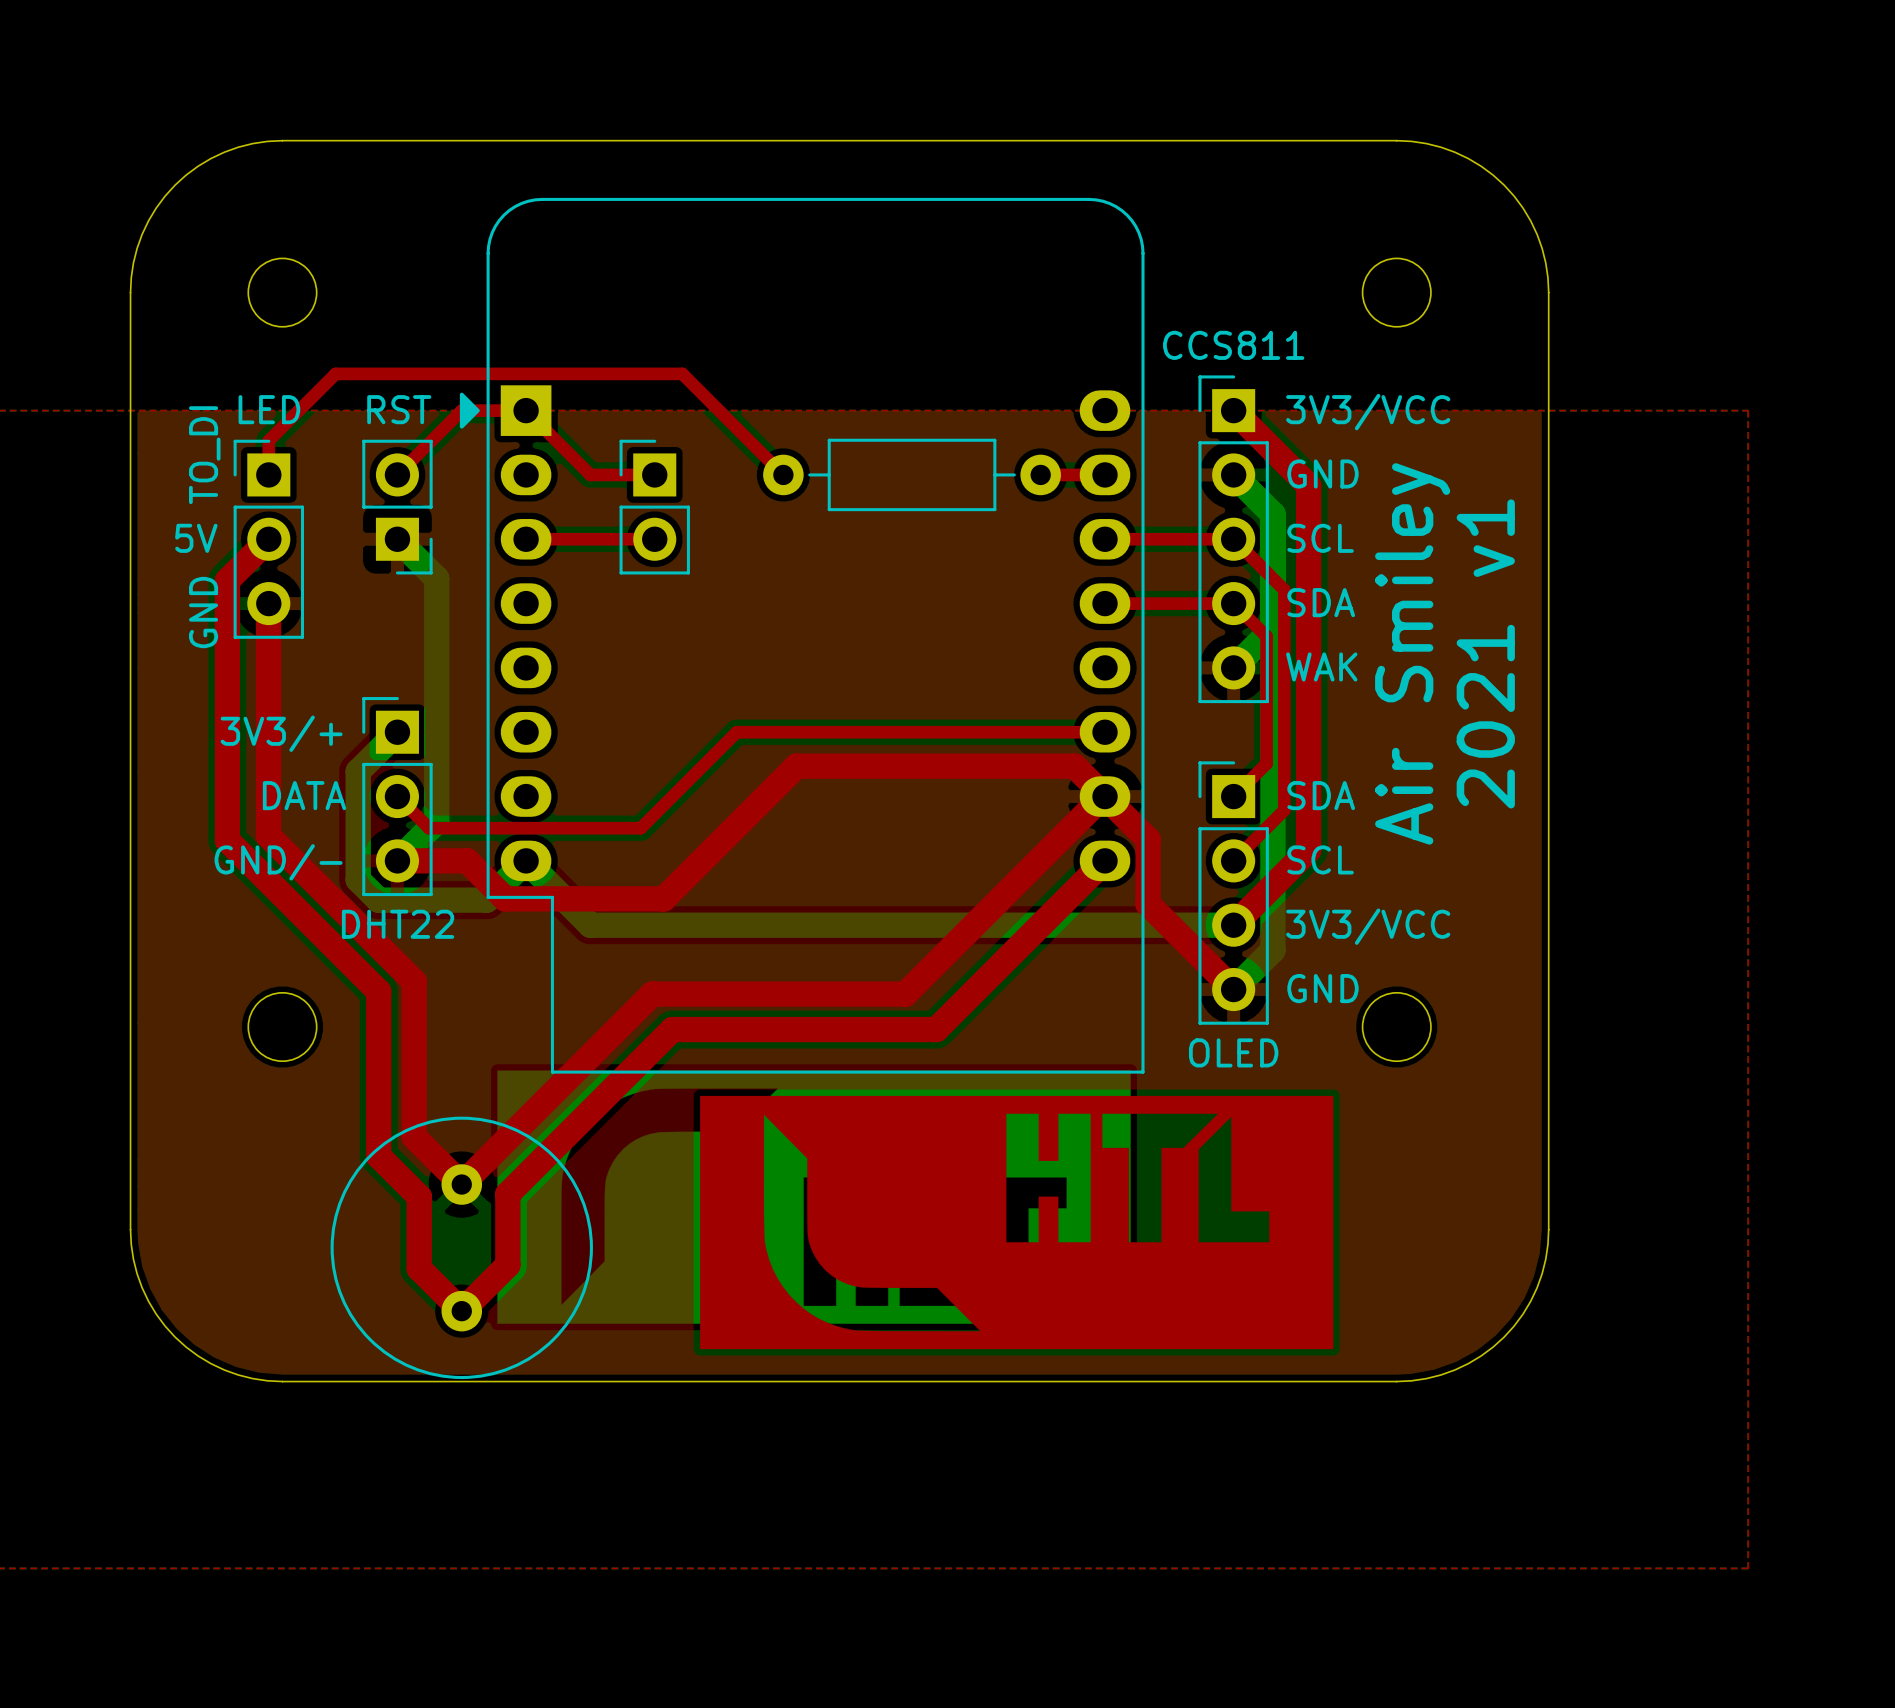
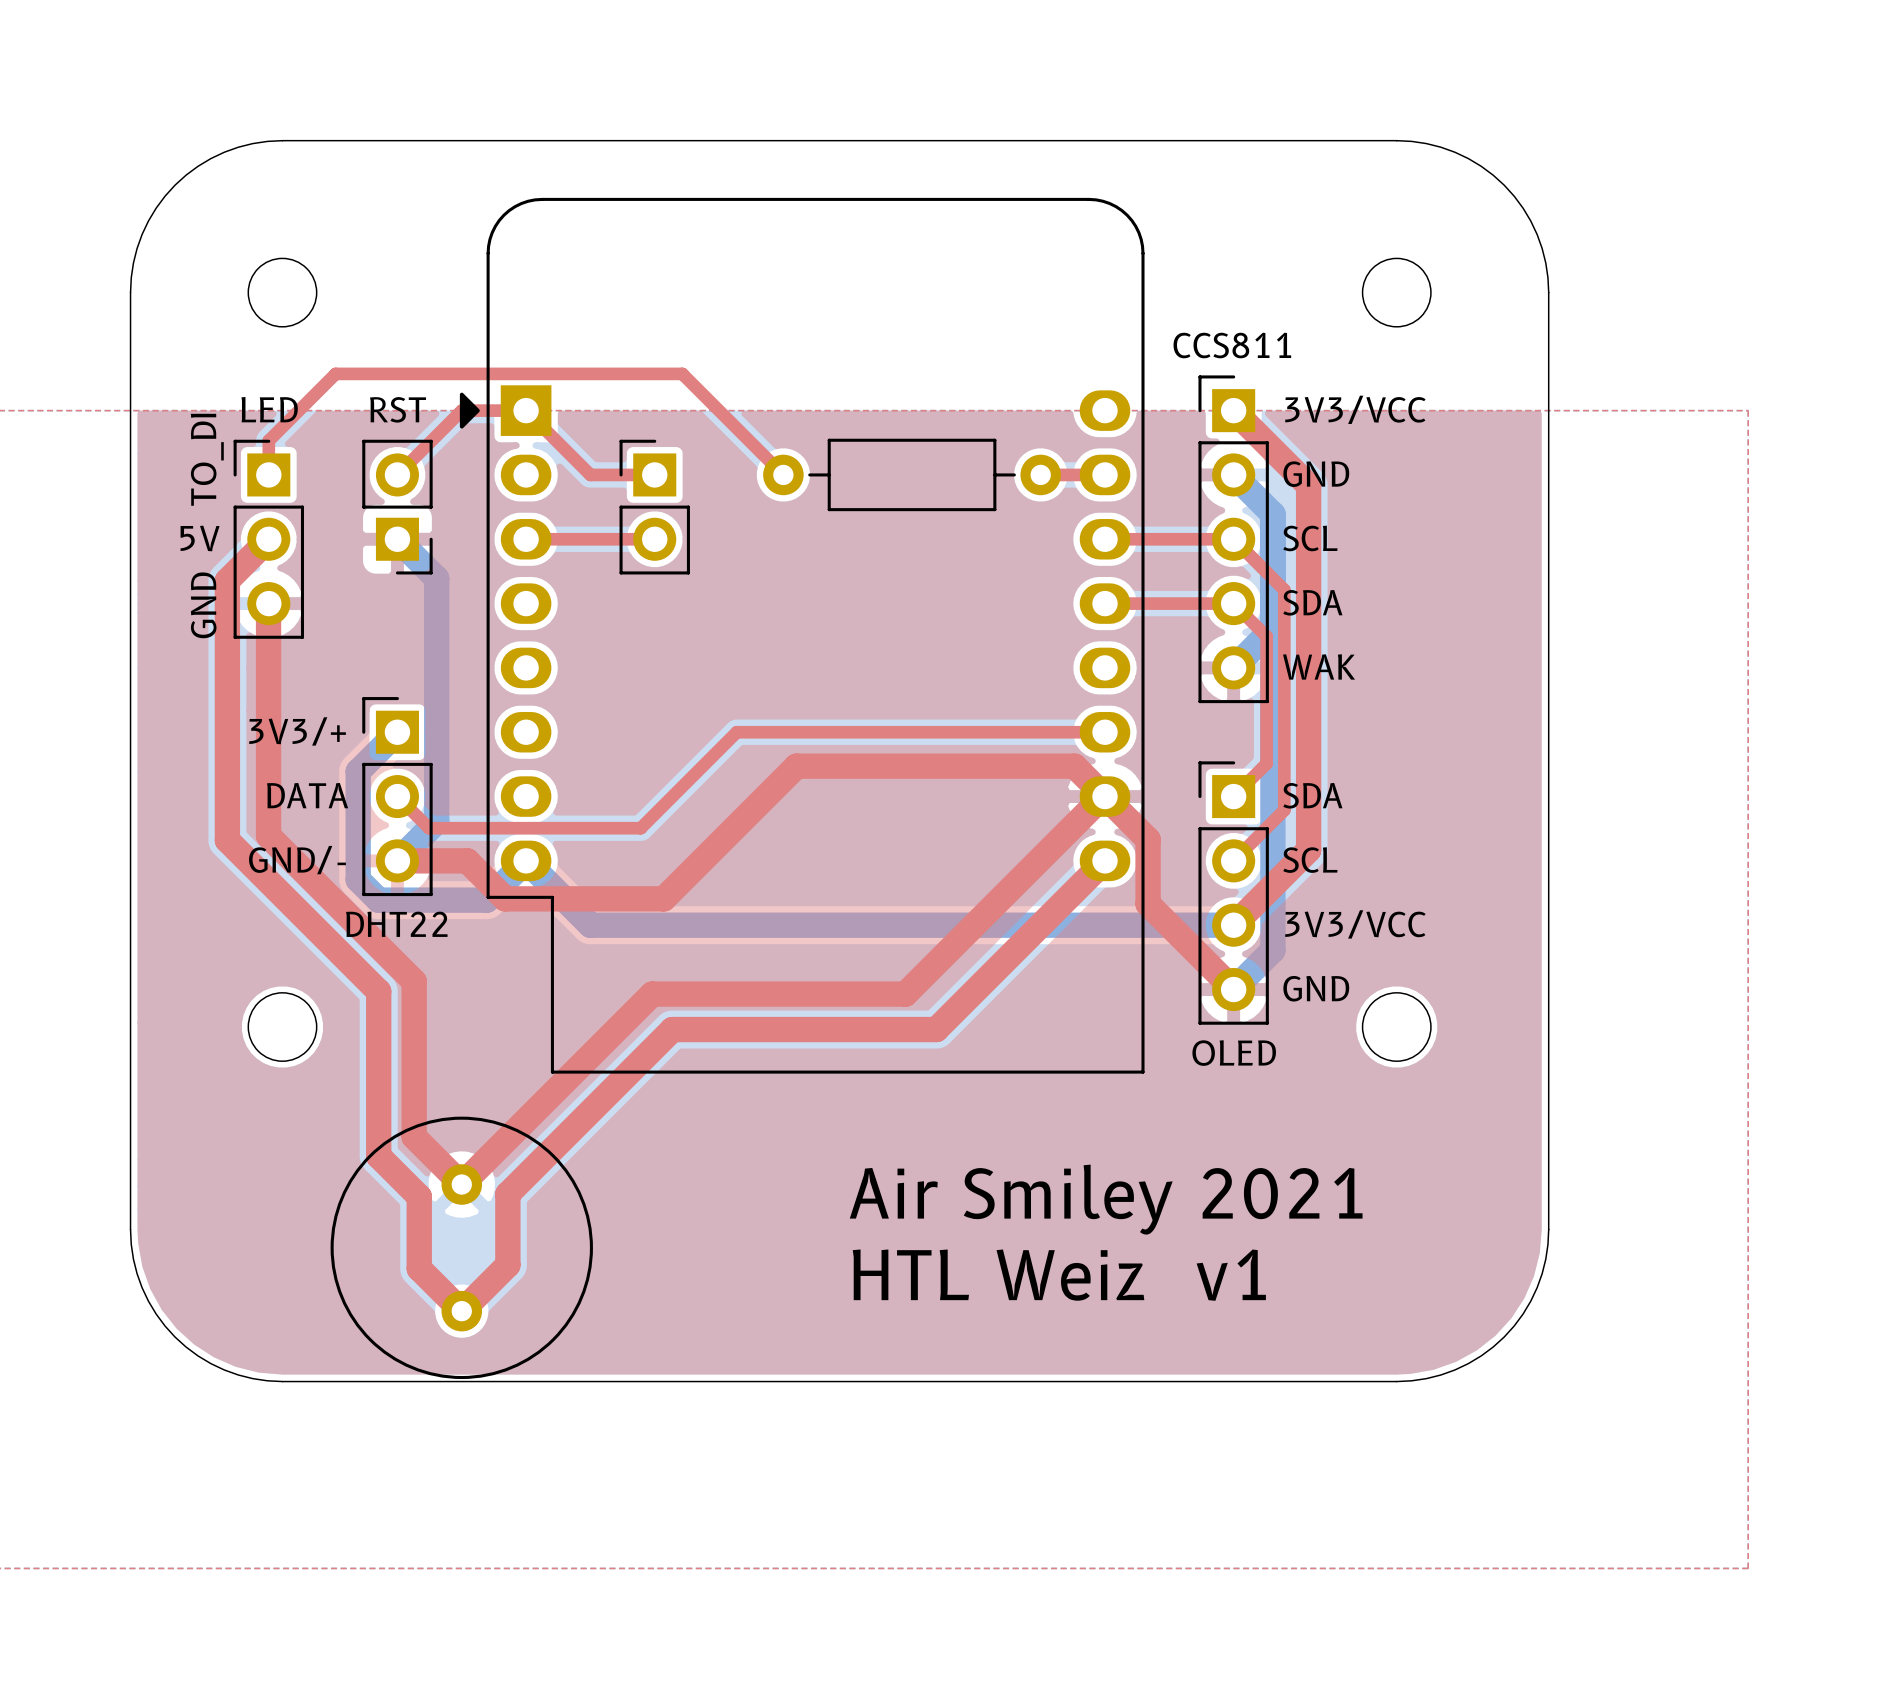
text: Air Smiley (1412, 653) -> none
text: 2021 v1 (1485, 653) -> none
drawing: [497, 1070, 1334, 1350] -> none
text: none -> Air Smiley 2021 (1106, 1199)
text: none -> HTL Weiz v1 (1059, 1275)

